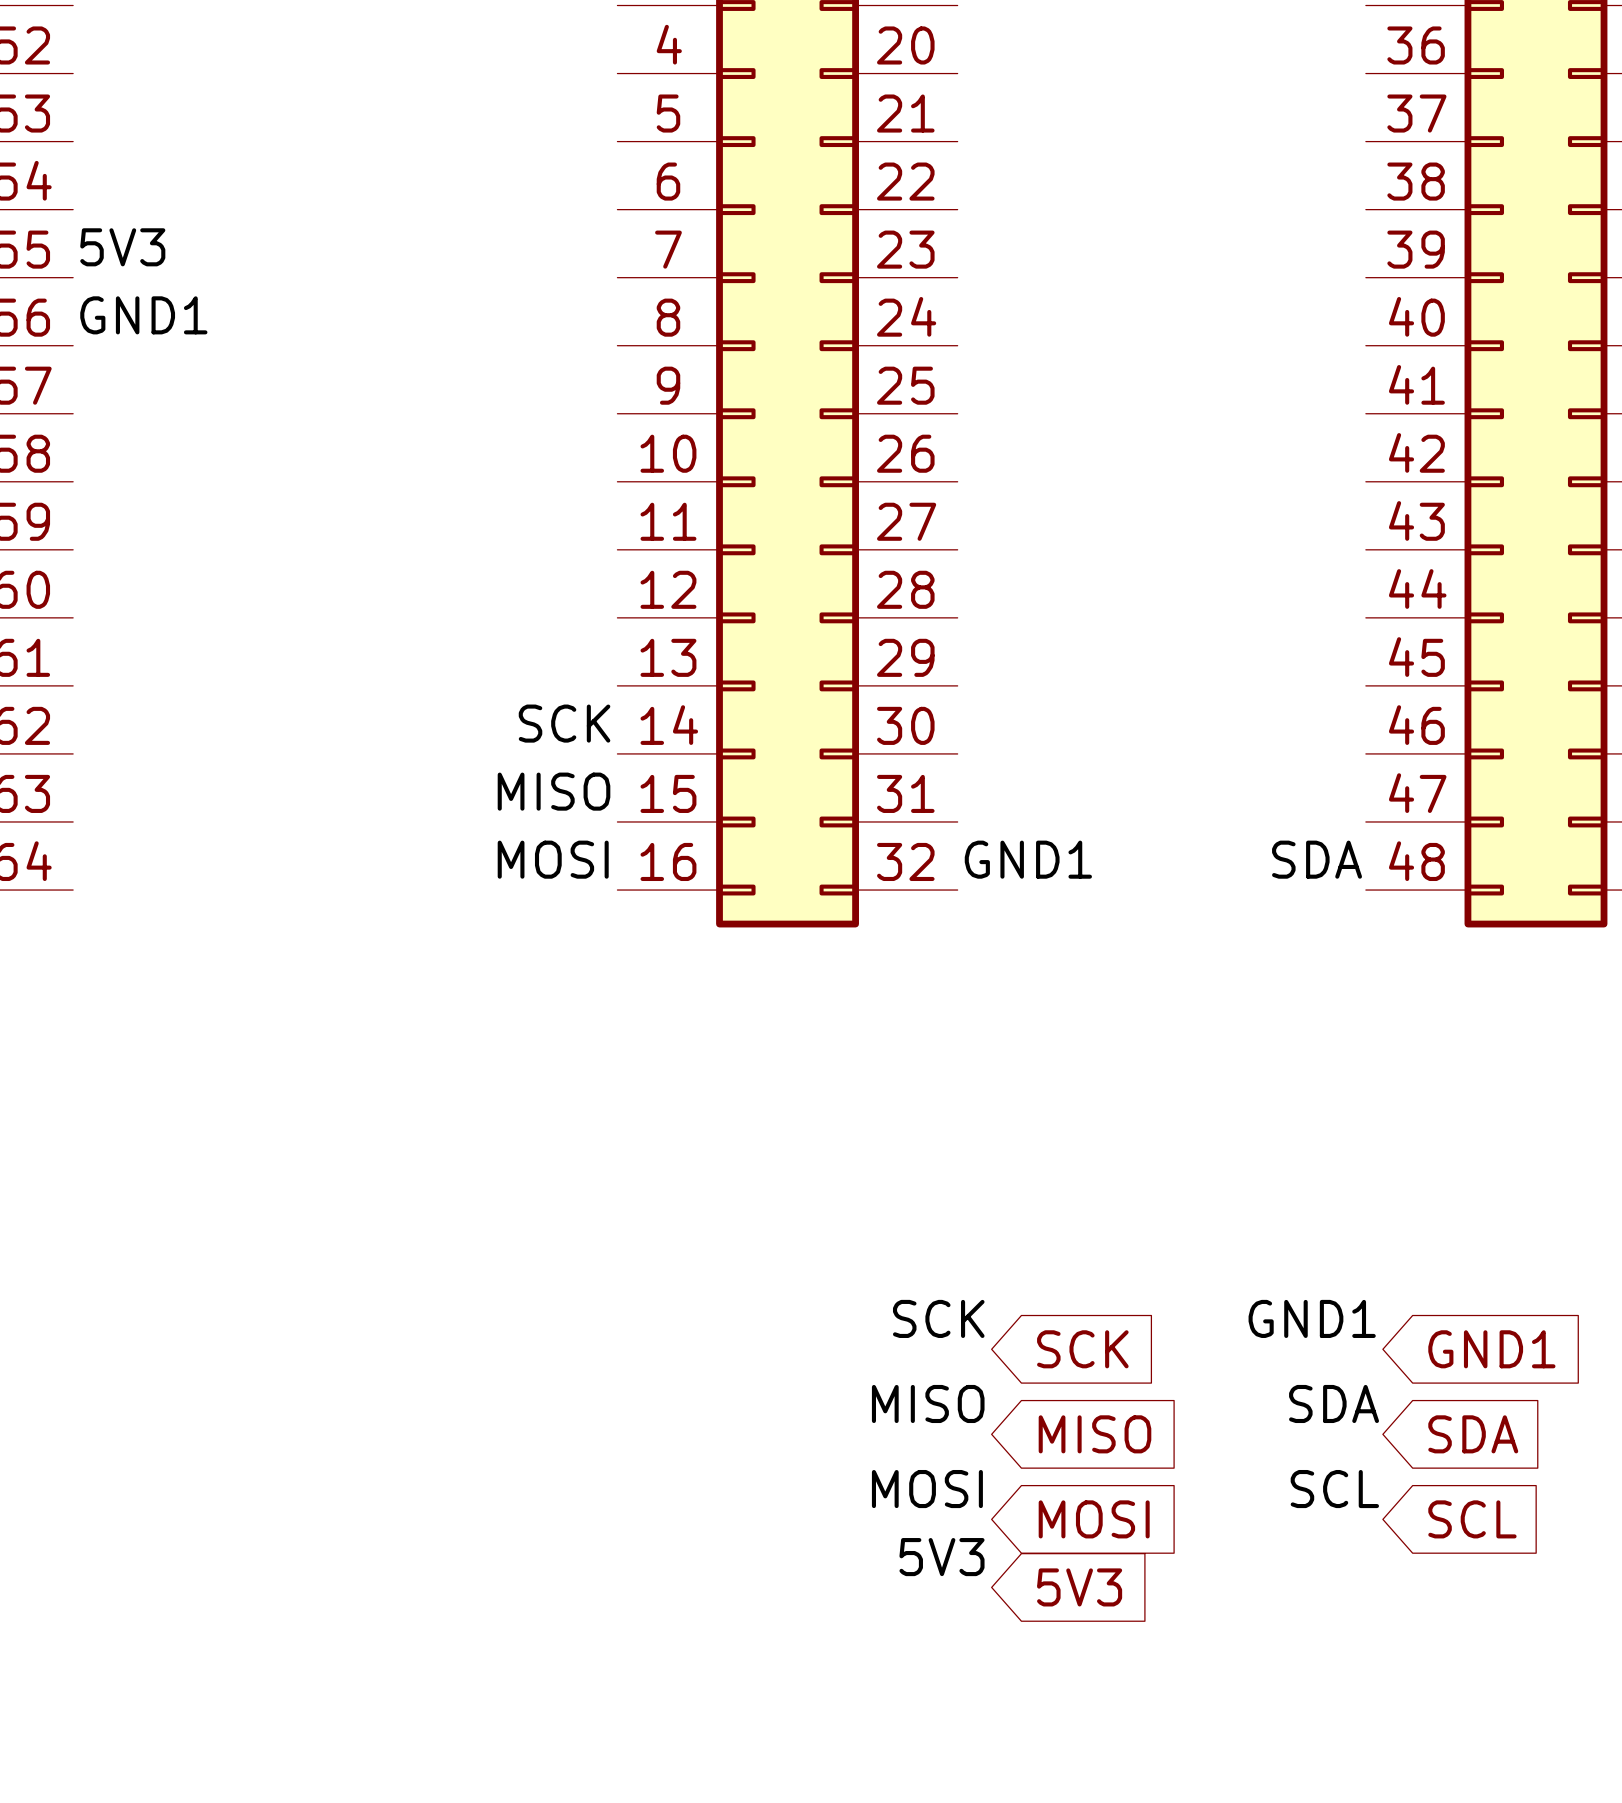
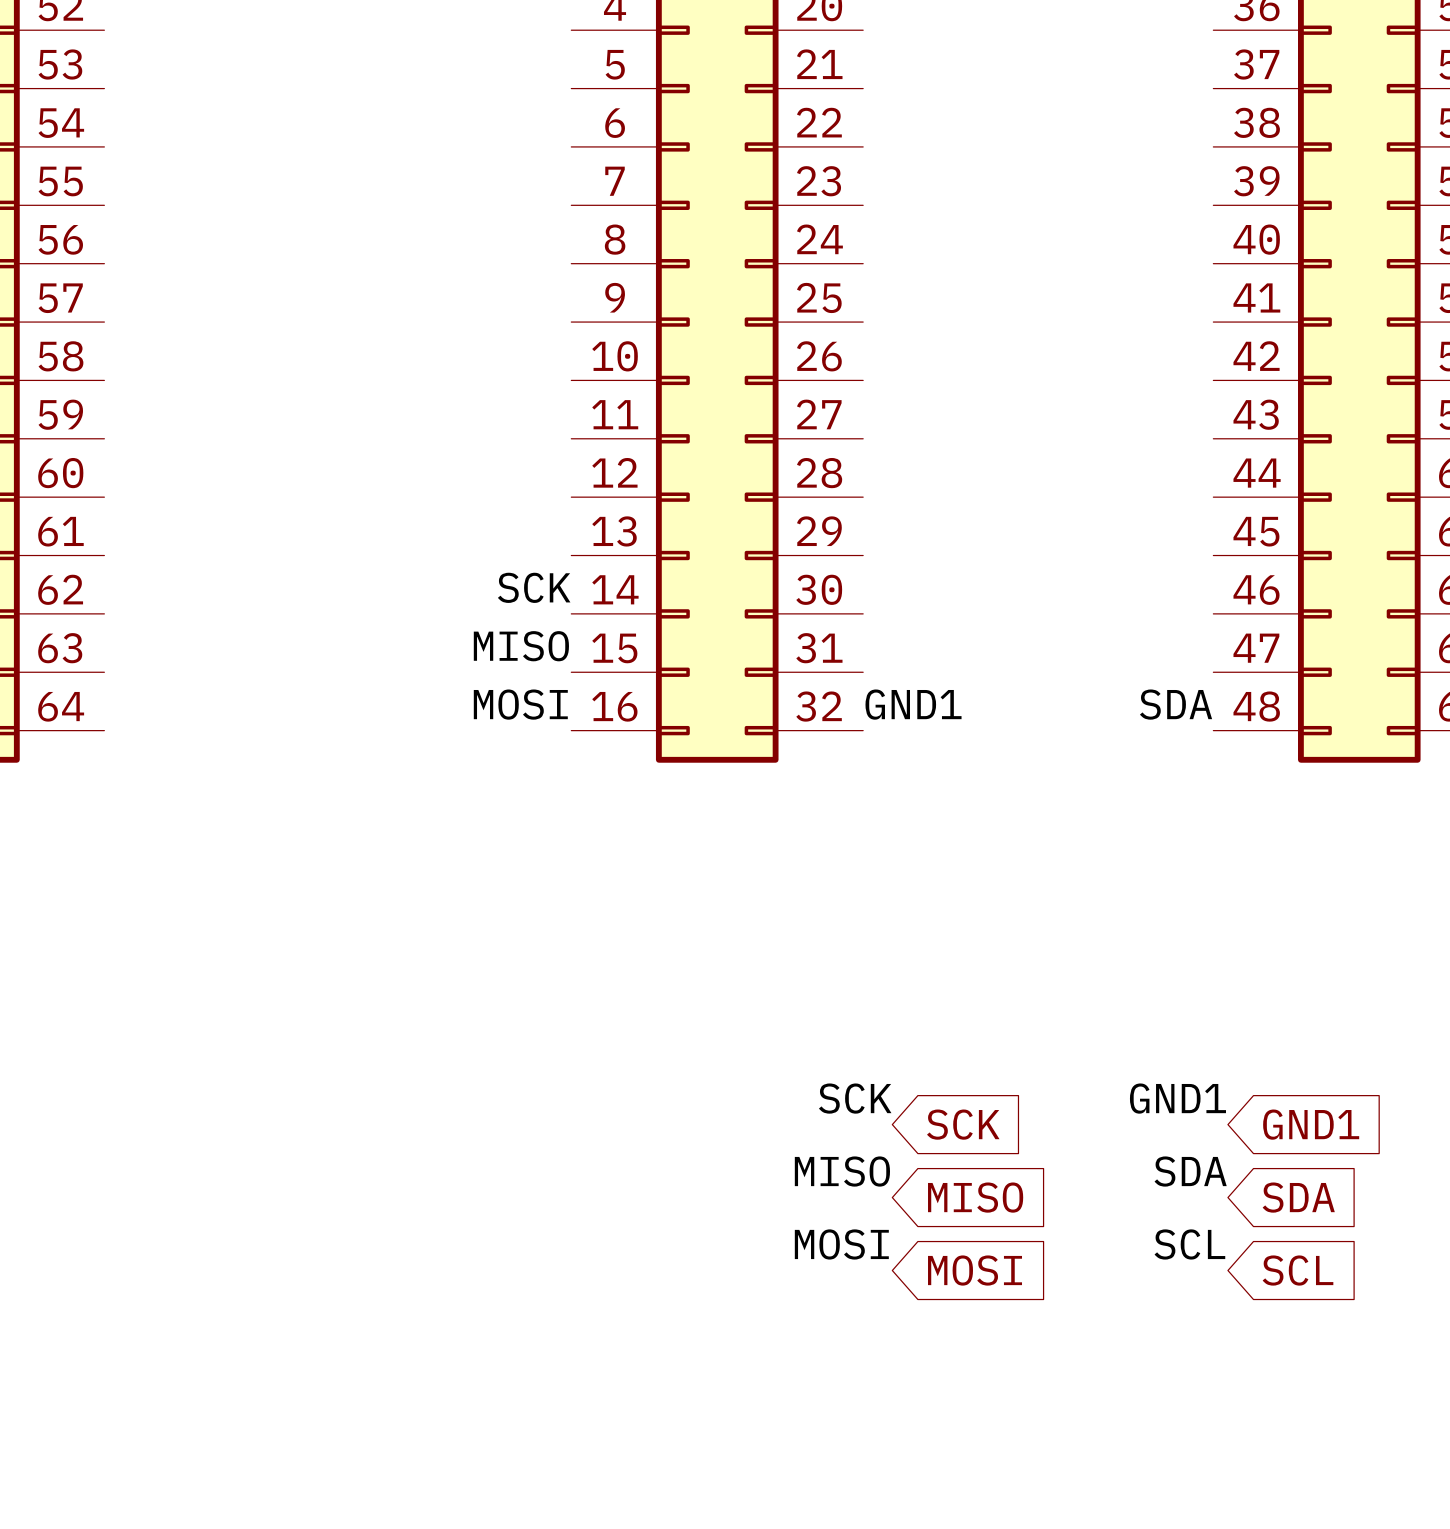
label: 5V3 (122, 247) -> none
label: GND1 (143, 315) -> none
label: 5V3 (941, 1557) -> none
global label: 5V3 (1079, 1587) -> none

